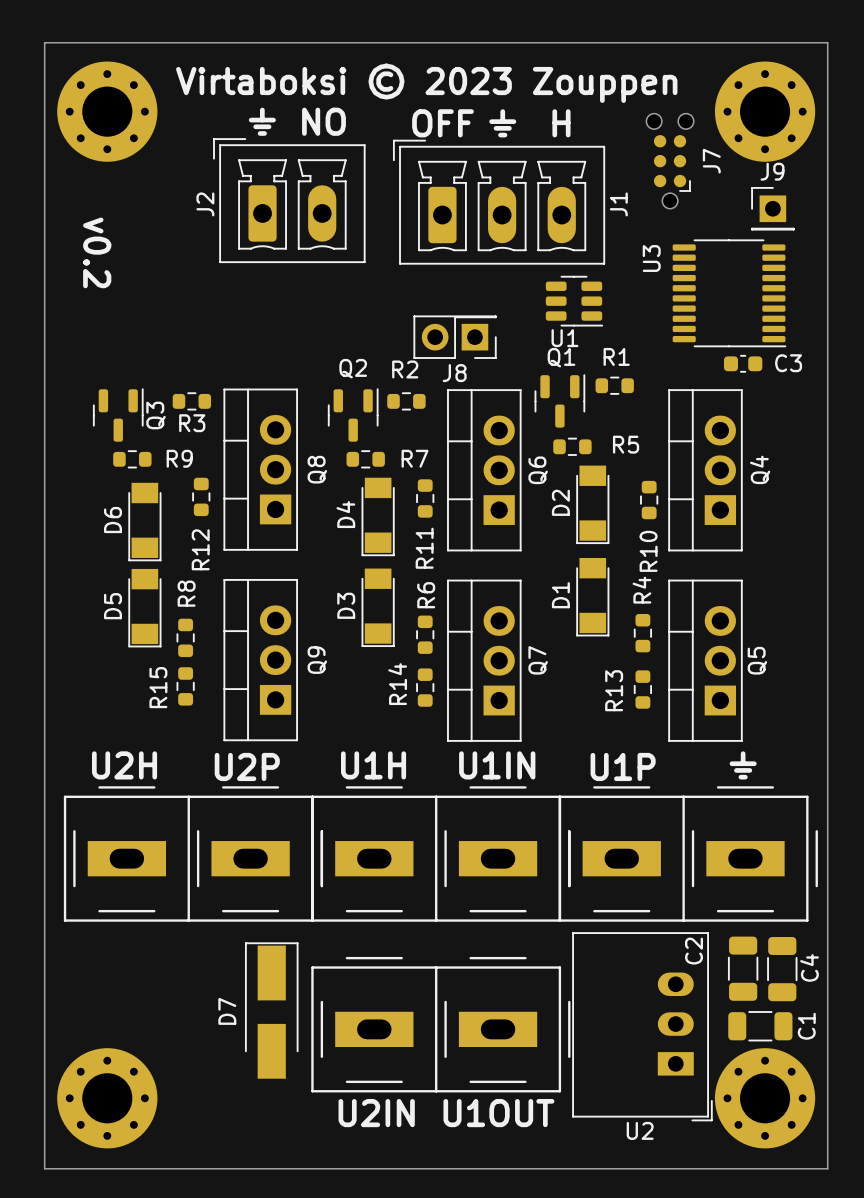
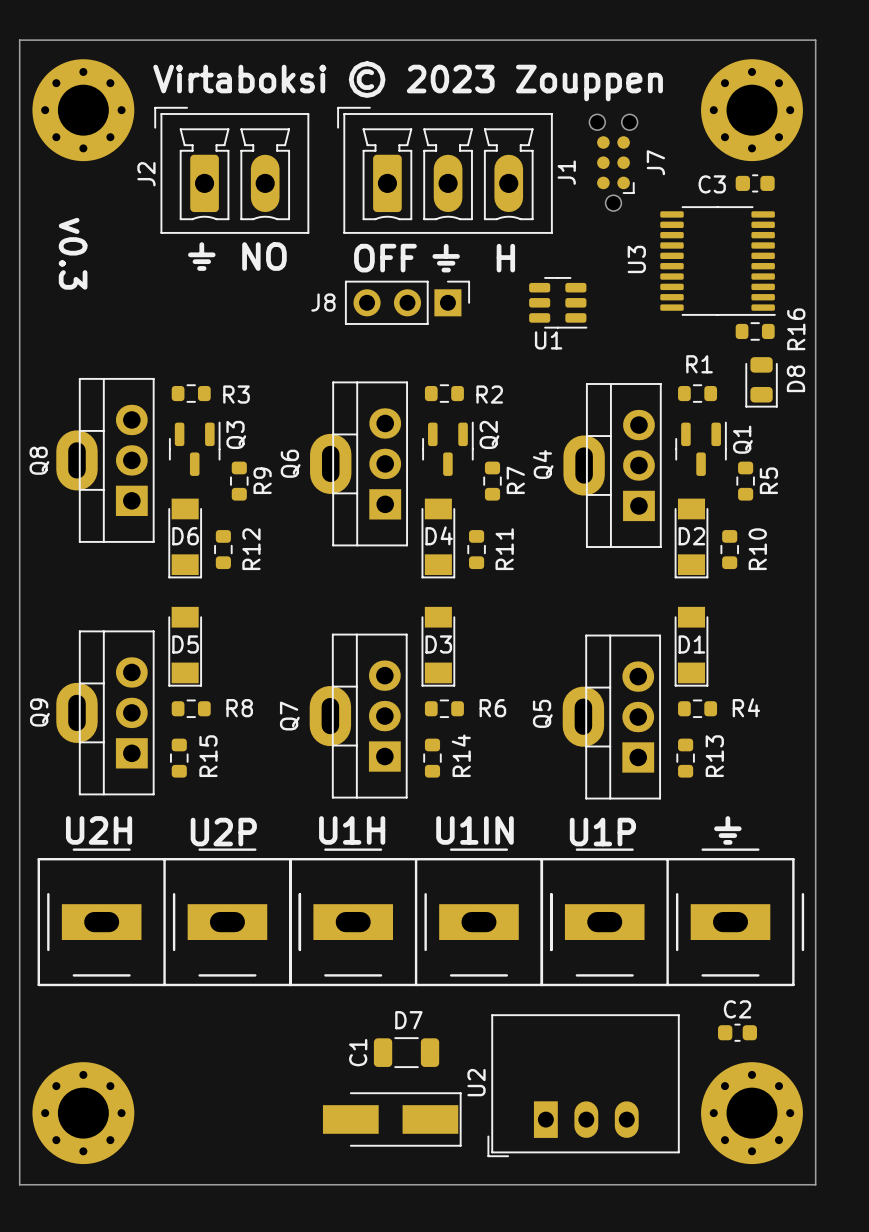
text: ⏚ (262, 121) -> none
text position: NO (323, 121) -> NO (264, 256)
text position: OFF (443, 123) -> OFF (385, 258)
text: ⏚ (502, 123) -> none
text position: H (561, 123) -> H (505, 258)
J7 position: (670, 161) -> (613, 162)
J2 position: (289, 200) -> (231, 170)
J1 position: (499, 202) -> (444, 170)
J9: (772, 208) -> none
text: v0.2 (97, 252) -> v0.3 (73, 253)
text: none -> ⏚ (201, 256)
text: none -> ⏚ (446, 258)
U3 position: (729, 293) -> (718, 261)
J8 footprint: [413, 315, 497, 359] -> [344, 280, 471, 325]
R16: none -> (755, 331)
Q1 name rotation: 0° (561, 357) -> 90° counterclockwise (742, 439)
Q1 name position: Q1 (561, 357) -> Q1 (742, 439)
C3 position: (743, 363) -> (755, 183)
C3 name position: C3 (788, 363) -> C3 (712, 184)
Q2 name rotation: 0° (353, 368) -> 90° counterclockwise (489, 434)
Q2 name position: Q2 (353, 368) -> Q2 (489, 434)
R2 name position: R2 (405, 369) -> R2 (489, 394)
J8 name position: J8 (454, 373) -> J8 (323, 302)
D8: none -> (761, 382)
R1 position: (614, 385) -> (697, 393)
Q1 position: (559, 400) -> (701, 448)
R3 position: (191, 401) -> (191, 393)
R2 position: (406, 401) -> (444, 393)
Q3 position: (118, 415) -> (194, 448)
Q3 name position: Q3 (156, 415) -> Q3 (236, 434)
Q2 position: (353, 415) -> (447, 448)
R3 name position: R3 (192, 423) -> R3 (236, 394)
R5 rotation: 0° (572, 446) -> 90° clockwise (745, 481)
R5 position: (572, 446) -> (745, 481)
part: none -> (77, 460)
R9 rotation: 0° (132, 459) -> 90° clockwise (239, 481)
R9 position: (132, 459) -> (239, 481)
part: none -> (330, 463)
R7 rotation: 0° (365, 459) -> 90° clockwise (492, 481)
R7 position: (365, 459) -> (492, 481)
part: none -> (584, 465)
Q8 position: (260, 469) -> (116, 460)
Q8 name position: Q8 (317, 469) -> Q8 (39, 460)
Q4 name position: Q4 (760, 469) -> Q4 (543, 464)
Q6 position: (484, 470) -> (370, 463)
Q6 name position: Q6 (538, 470) -> Q6 (290, 463)
Q4 position: (705, 470) -> (623, 465)
R12 position: (201, 496) -> (223, 549)
R11 position: (425, 498) -> (476, 549)
R10 position: (649, 500) -> (729, 549)
D2 name rotation: 0° (560, 502) -> 90° clockwise (691, 536)
D2 position: (592, 504) -> (691, 538)
D4 name rotation: 0° (345, 514) -> 90° clockwise (439, 535)
D4 position: (378, 516) -> (438, 538)
D6 name rotation: 0° (112, 520) -> 90° clockwise (185, 536)
D6 position: (144, 522) -> (185, 538)
R11 name position: R11 (424, 548) -> R11 (504, 549)
R12 name position: R12 (200, 549) -> R12 (251, 549)
R10 name position: R10 (648, 551) -> R10 (757, 549)
D1 name rotation: 0° (560, 595) -> 90° clockwise (691, 644)
D1 position: (592, 597) -> (691, 646)
D3 name rotation: 0° (346, 605) -> 90° clockwise (438, 644)
D5 name rotation: 0° (112, 606) -> 90° clockwise (185, 644)
D3 position: (378, 607) -> (438, 646)
D5 position: (144, 608) -> (185, 646)
R4 rotation: 0° (642, 633) -> 90° clockwise (697, 708)
R4 position: (642, 633) -> (697, 708)
R6 rotation: 0° (425, 634) -> 90° clockwise (444, 708)
R6 position: (425, 634) -> (444, 708)
R8 rotation: 0° (185, 637) -> 90° clockwise (191, 708)
R8 position: (185, 637) -> (191, 708)
Q9 position: (260, 660) -> (116, 712)
Q9 name position: Q9 (317, 660) -> Q9 (39, 712)
Q7 position: (484, 660) -> (369, 716)
Q7 name position: Q7 (538, 660) -> Q7 (289, 716)
Q5 position: (705, 660) -> (623, 717)
Q5 name position: Q5 (757, 660) -> Q5 (542, 713)
R14 name position: R14 (397, 684) -> R14 (461, 755)
R15 position: (185, 686) -> (179, 758)
R15 name position: R15 (158, 687) -> R15 (208, 756)
R14 position: (425, 687) -> (432, 758)
R13 position: (642, 689) -> (685, 758)
R13 name position: R13 (614, 690) -> R13 (714, 756)
part: none -> (77, 712)
part: none -> (330, 716)
part: none -> (583, 716)
text position: U2H (124, 765) -> U2H (99, 830)
text position: U1H (373, 765) -> U1H (352, 830)
text position: U1IN (497, 765) -> U1IN (474, 830)
text position: ⏚ (743, 765) -> ⏚ (727, 830)
text position: U2P (247, 766) -> U2P (223, 832)
text position: U1P (623, 766) -> U1P (602, 832)
part position: (193, 853) -> (169, 917)
part position: (440, 853) -> (420, 917)
part position: (688, 853) -> (672, 917)
C2 footprint: [727, 936, 759, 1001] -> [718, 1023, 758, 1042]
C2 name position: C2 (694, 951) -> C2 (737, 1009)
C4: (782, 969) -> none
D7 rotation: 0° (271, 1010) -> 90° clockwise (392, 1119)
D7 position: (271, 1010) -> (392, 1119)
D7 name position: D7 (227, 1011) -> D7 (408, 1020)
part: (440, 1024) -> none
U2 rotation: 0° (642, 1026) -> 90° clockwise (583, 1085)
C1 position: (760, 1026) -> (406, 1052)
C1 name position: C1 (806, 1026) -> C1 (358, 1052)
text: U2IN (376, 1113) -> none
text: U1OUT (498, 1113) -> none

